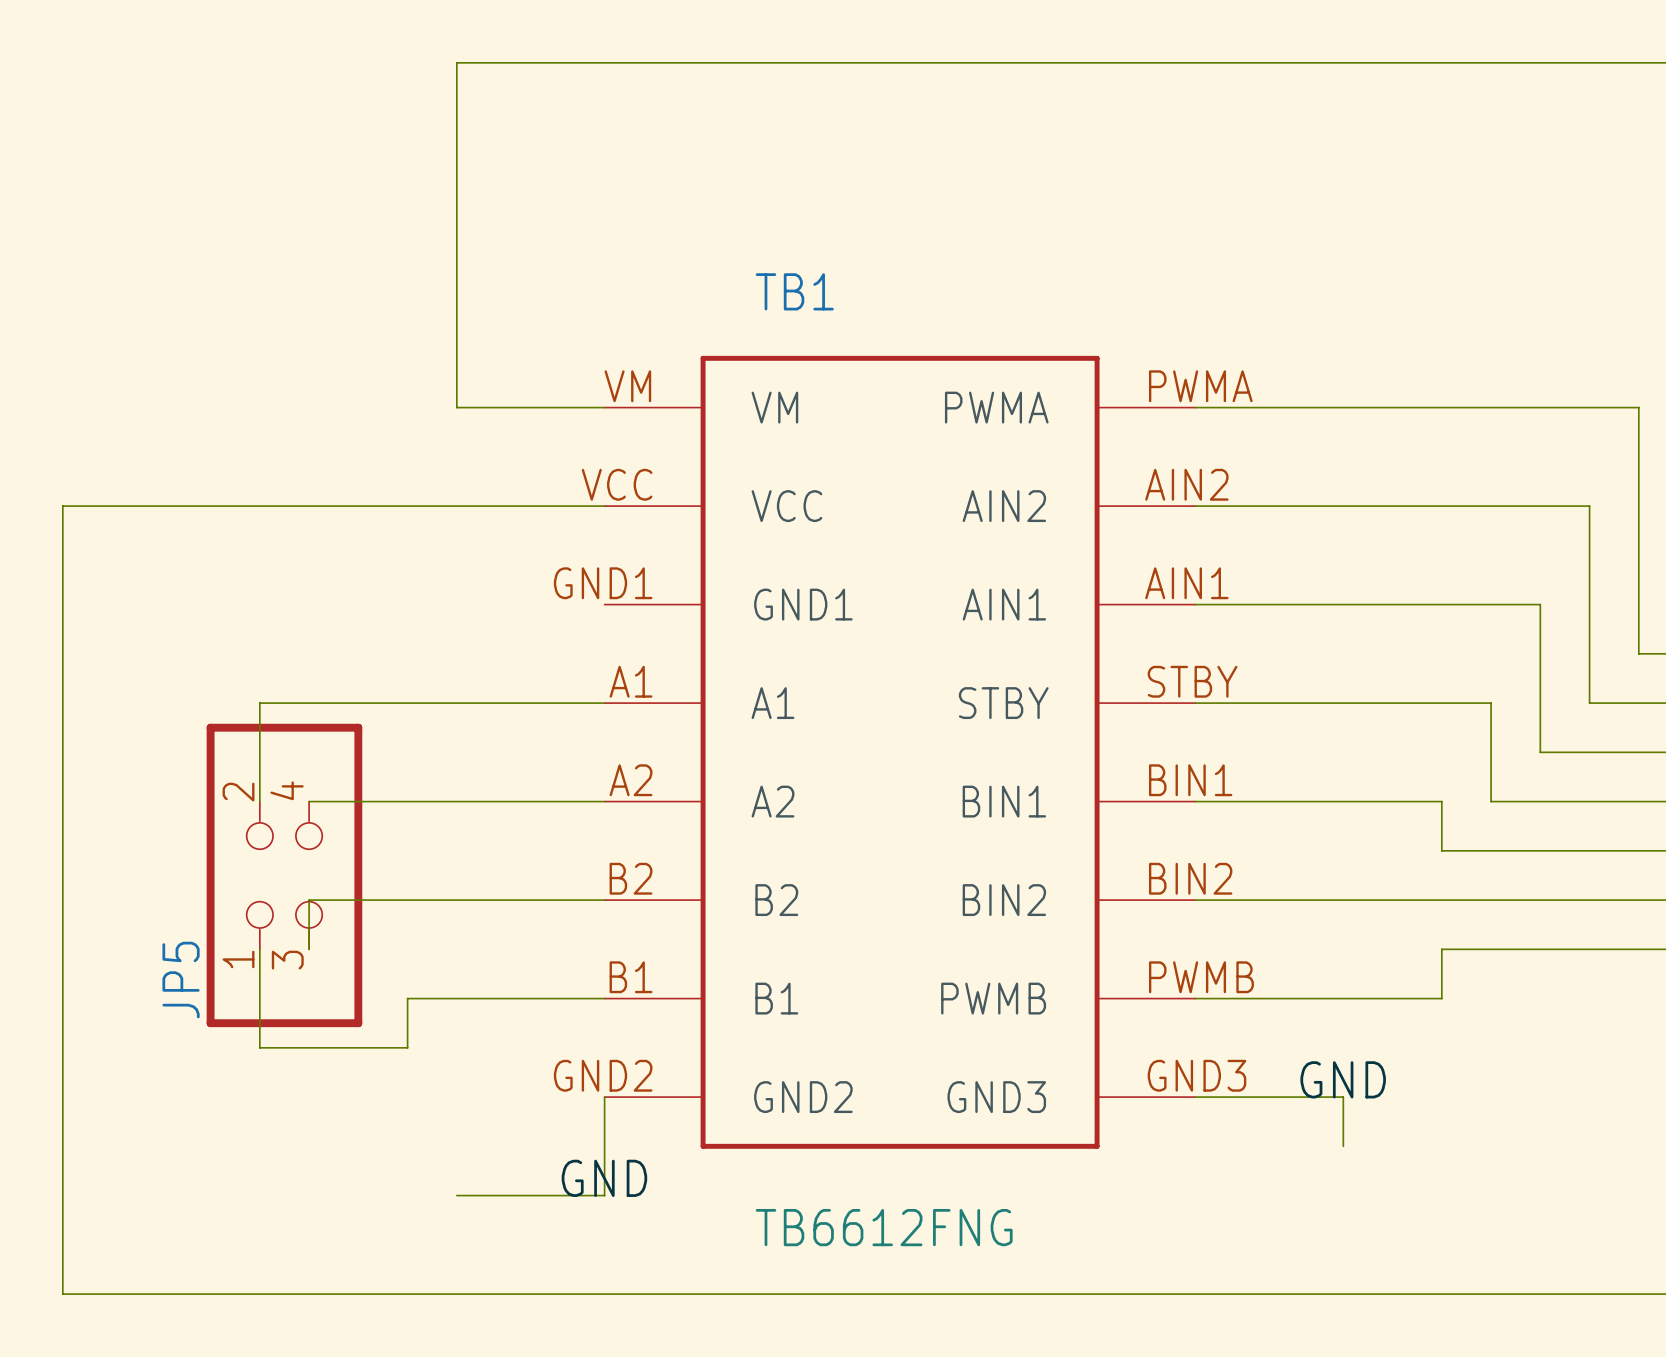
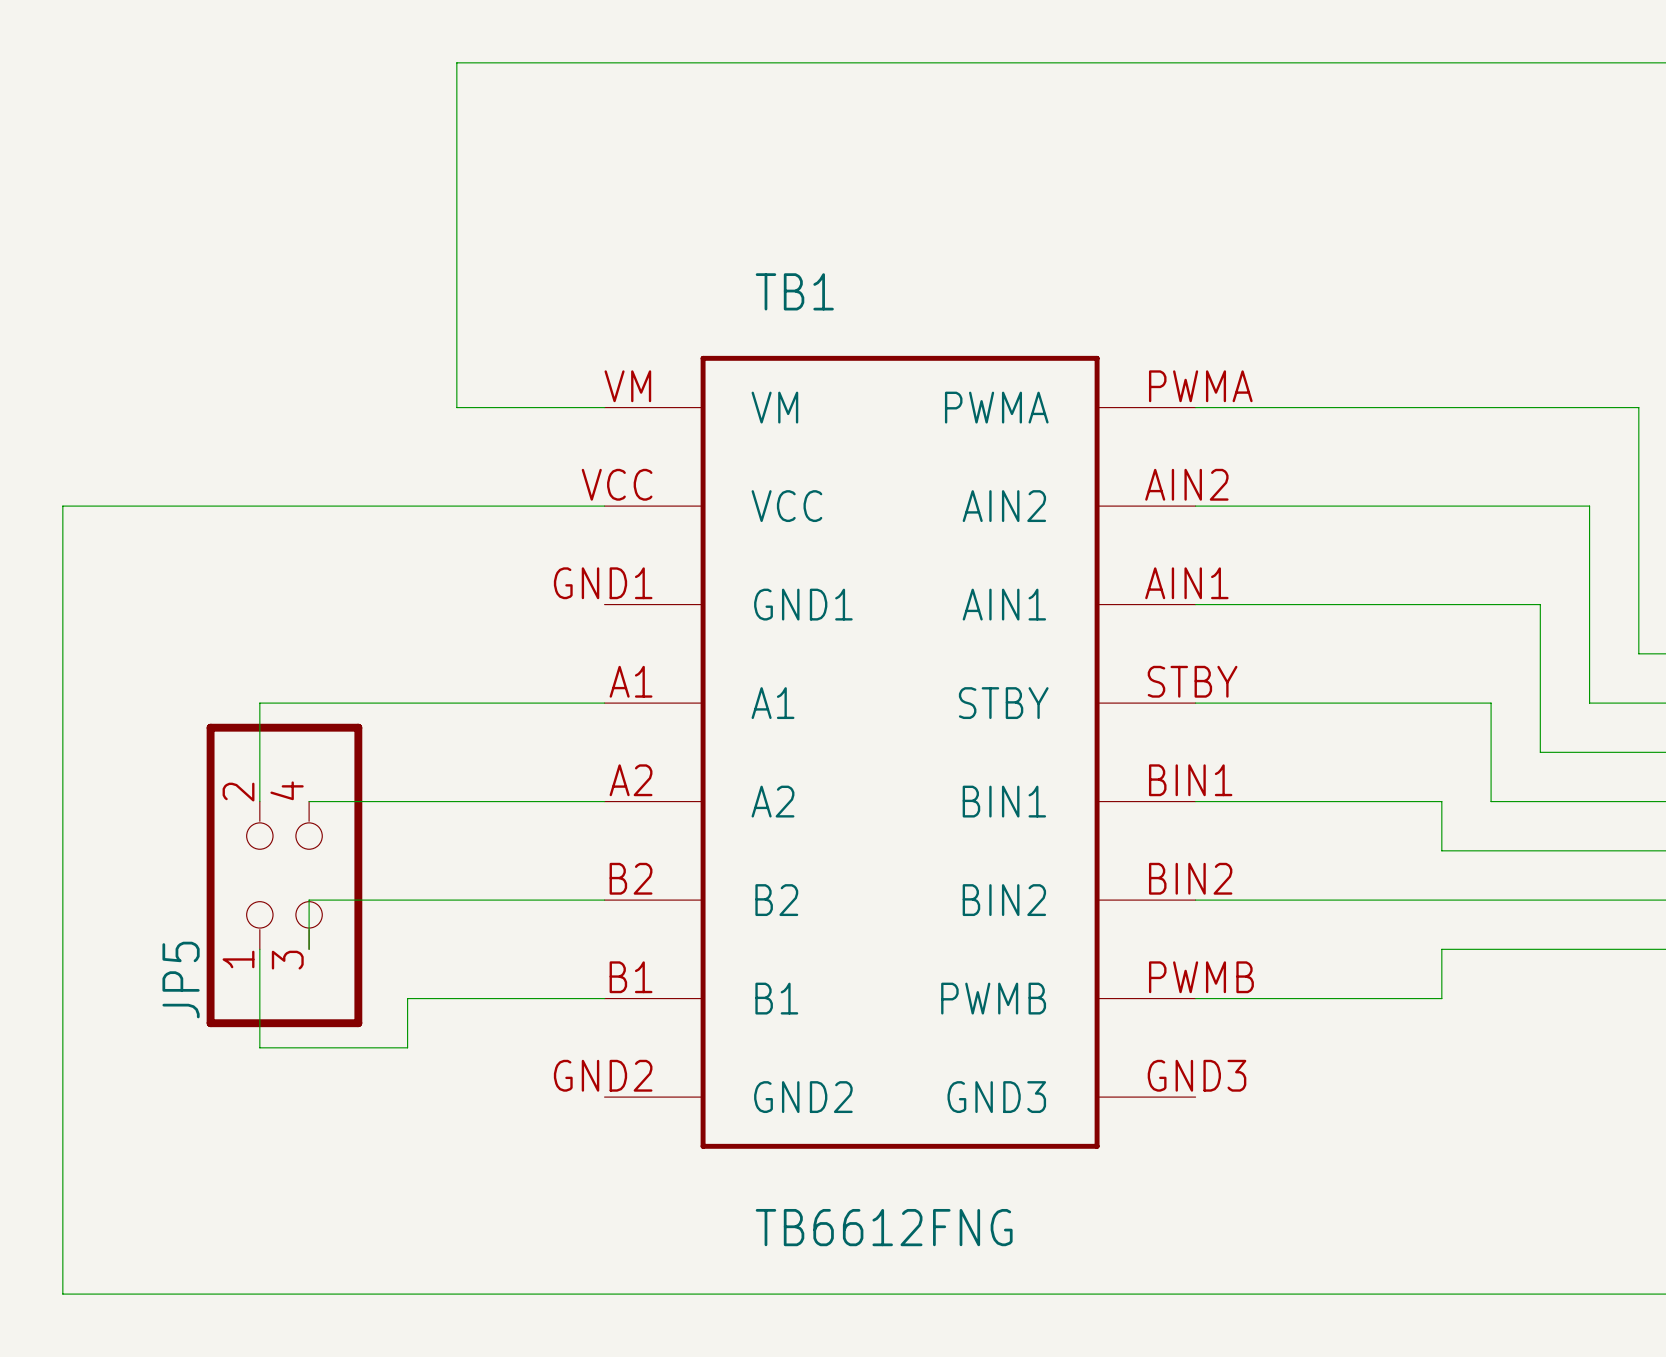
label: GND (1343, 1079) -> none
wire: (604, 1097) (604, 1195) (456, 1195) -> none
wire: (1195, 1097) (1343, 1097) (1343, 1146) -> none
label: GND (604, 1178) -> none

